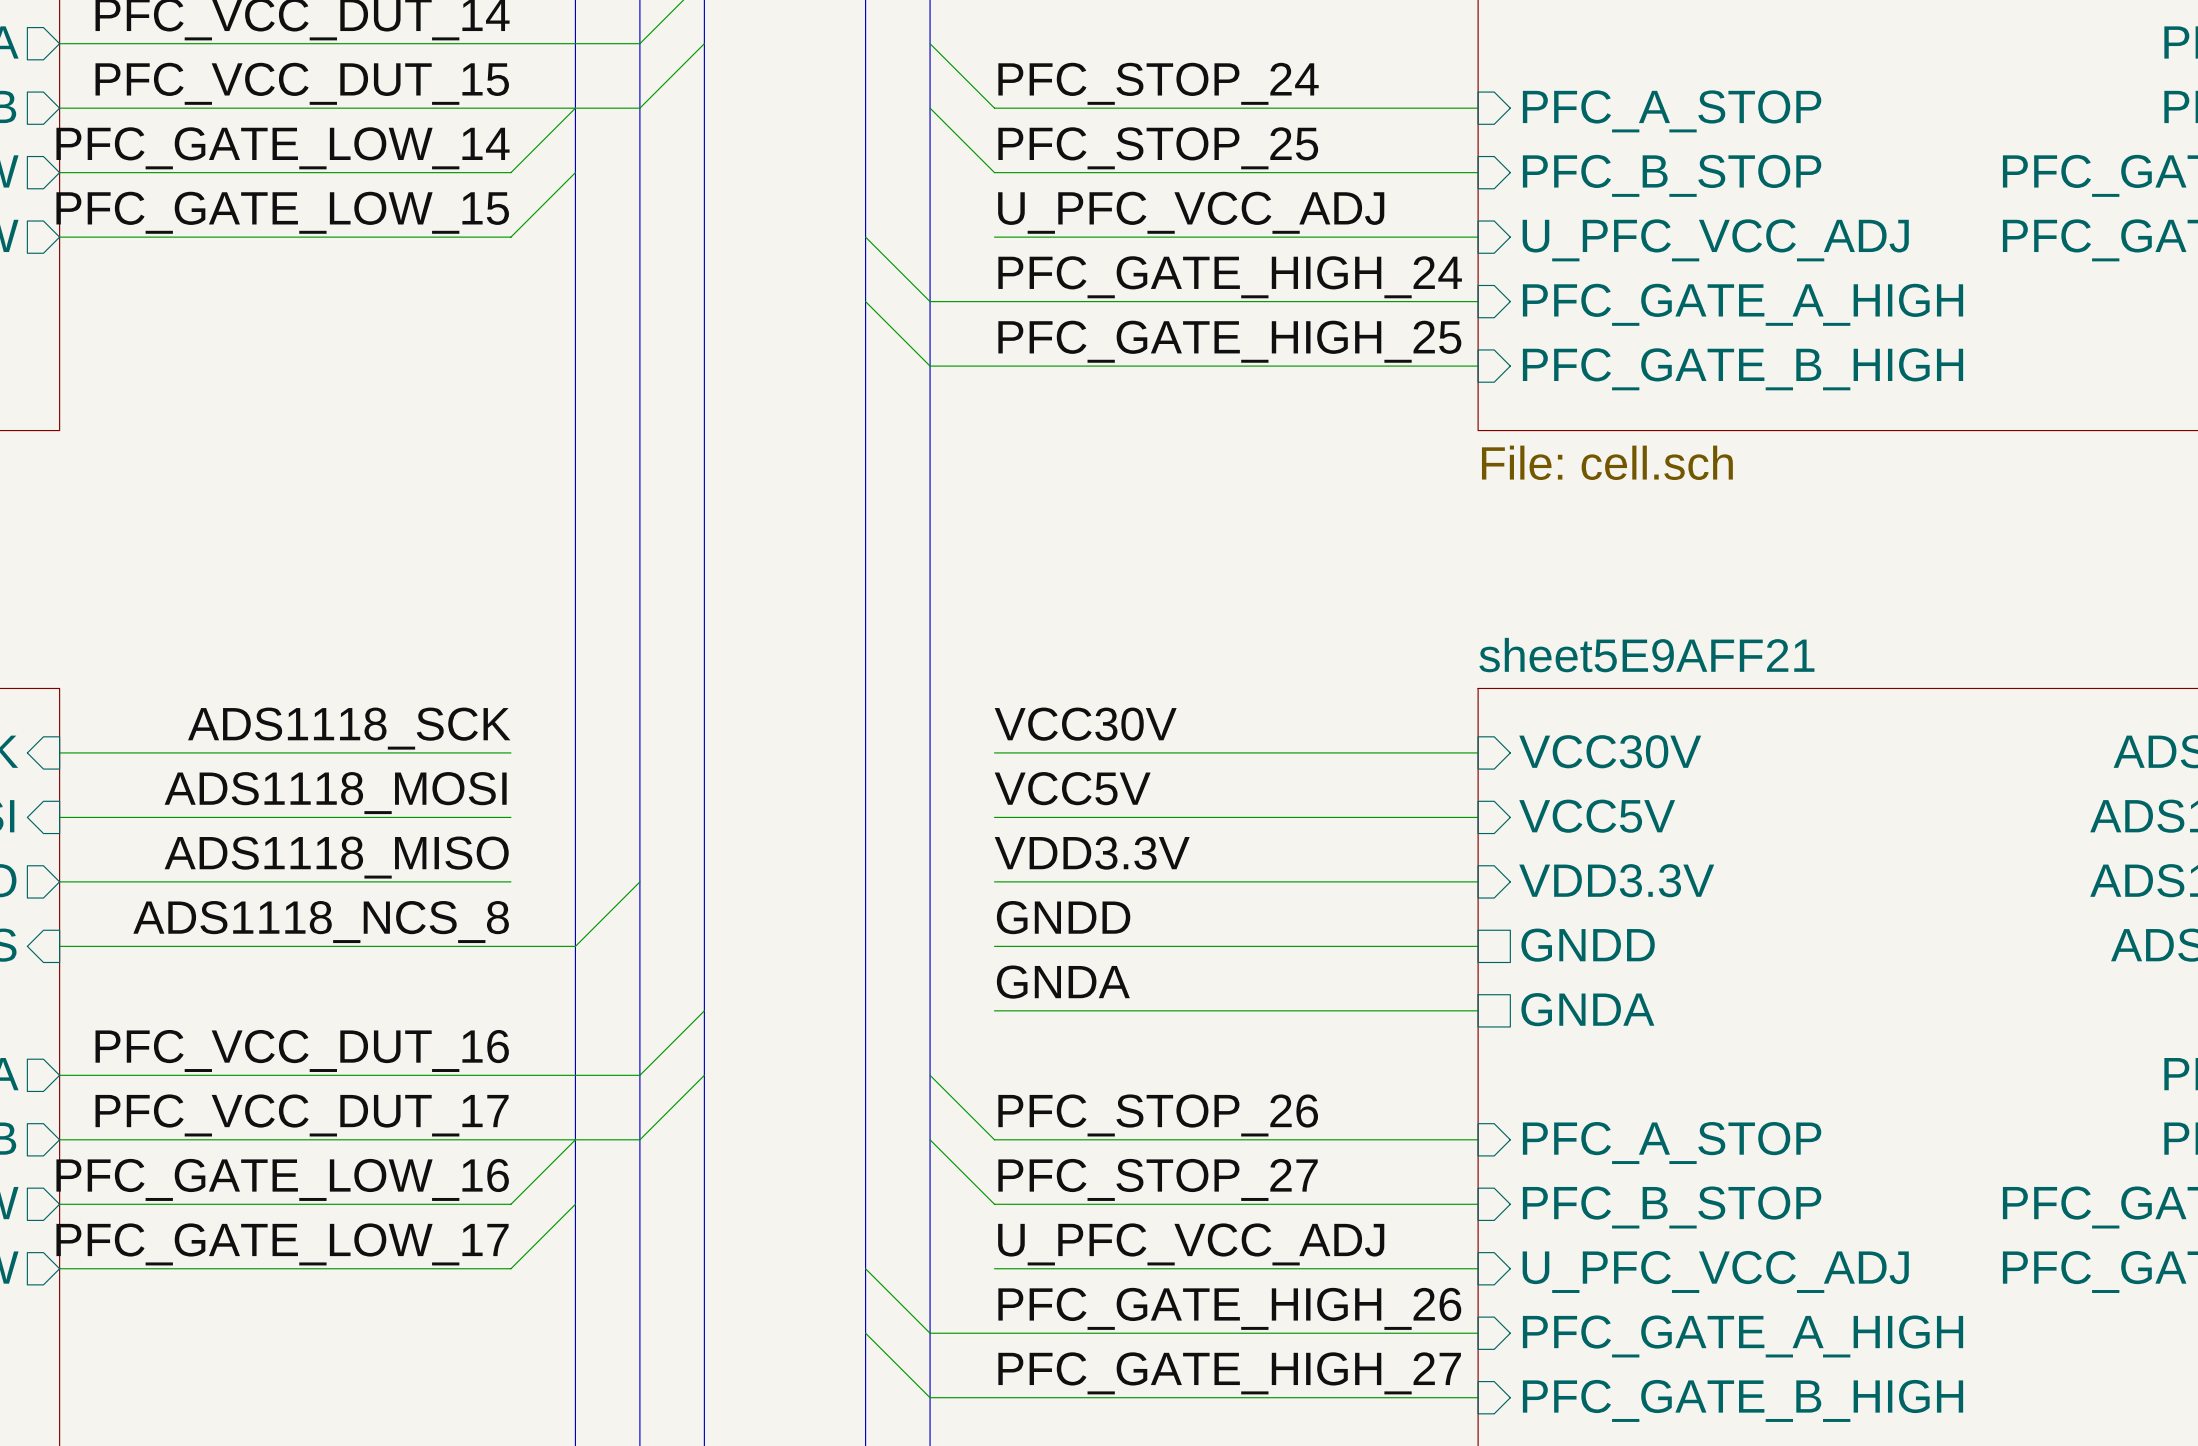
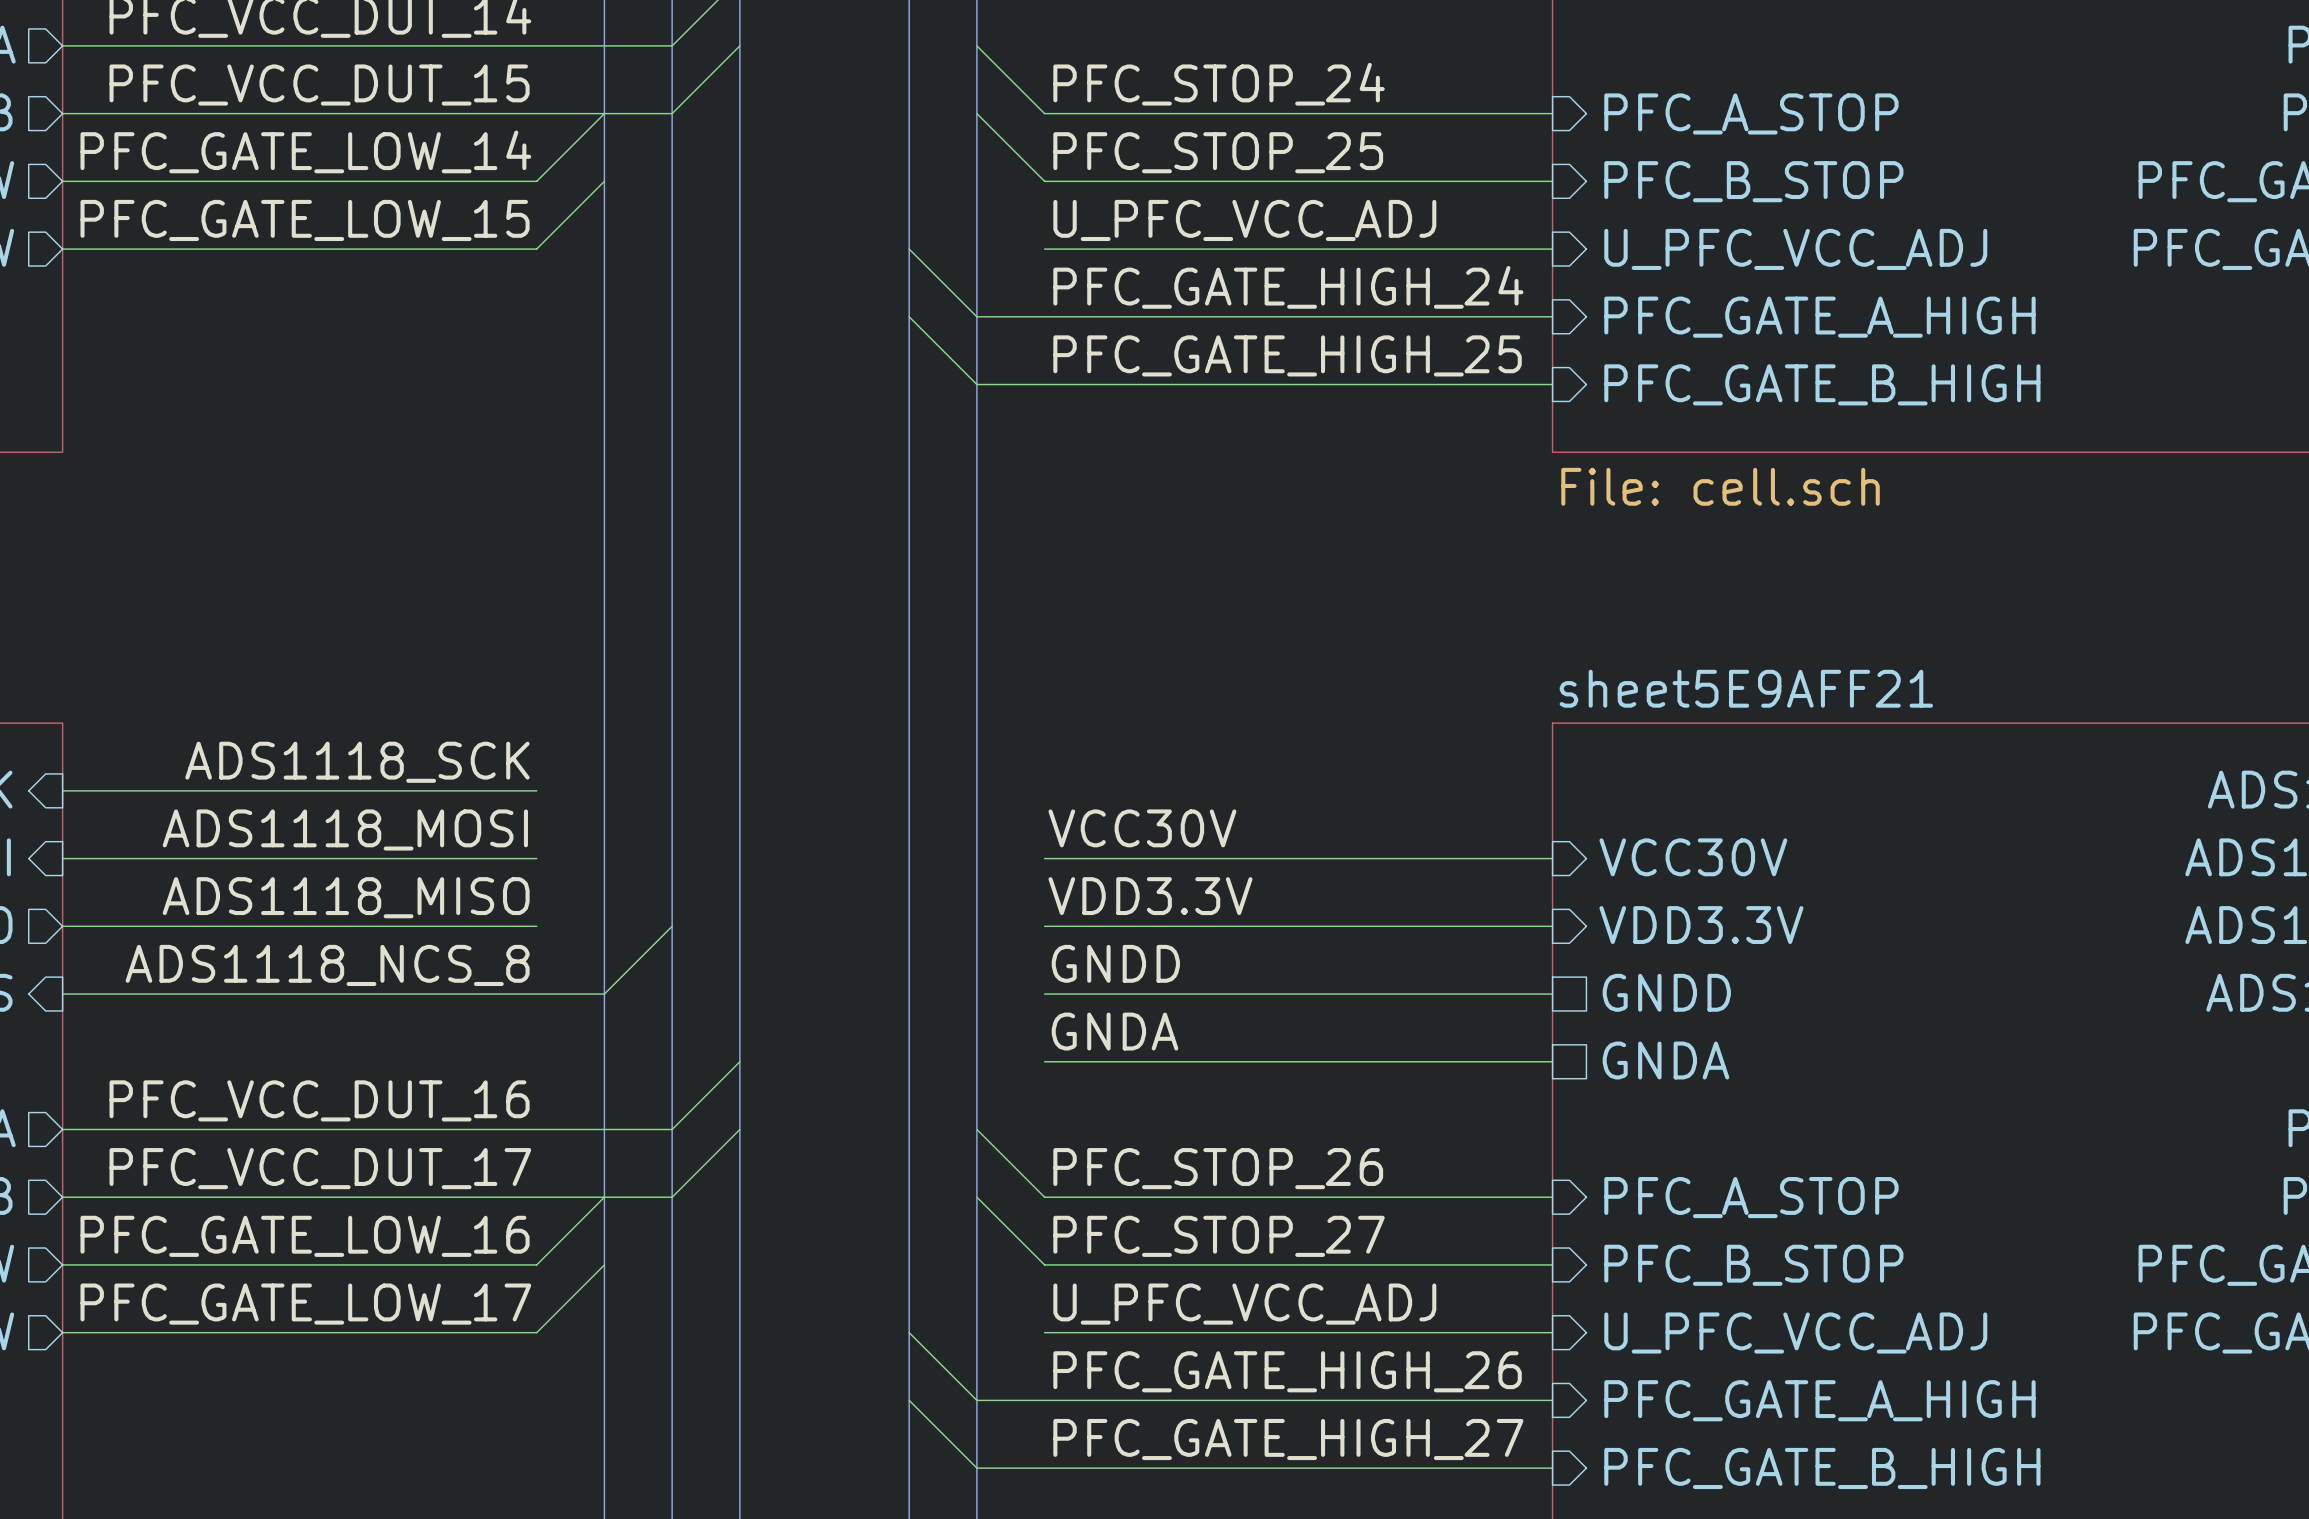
label: VCC30V (1085, 724) -> none
sheet pin: VCC30V (1610, 751) -> none
wire: (994, 752) (1478, 752) -> none
label: VCC5V (1072, 788) -> VCC30V (1142, 828)
sheet pin: VCC5V (1597, 816) -> VCC30V (1693, 857)

